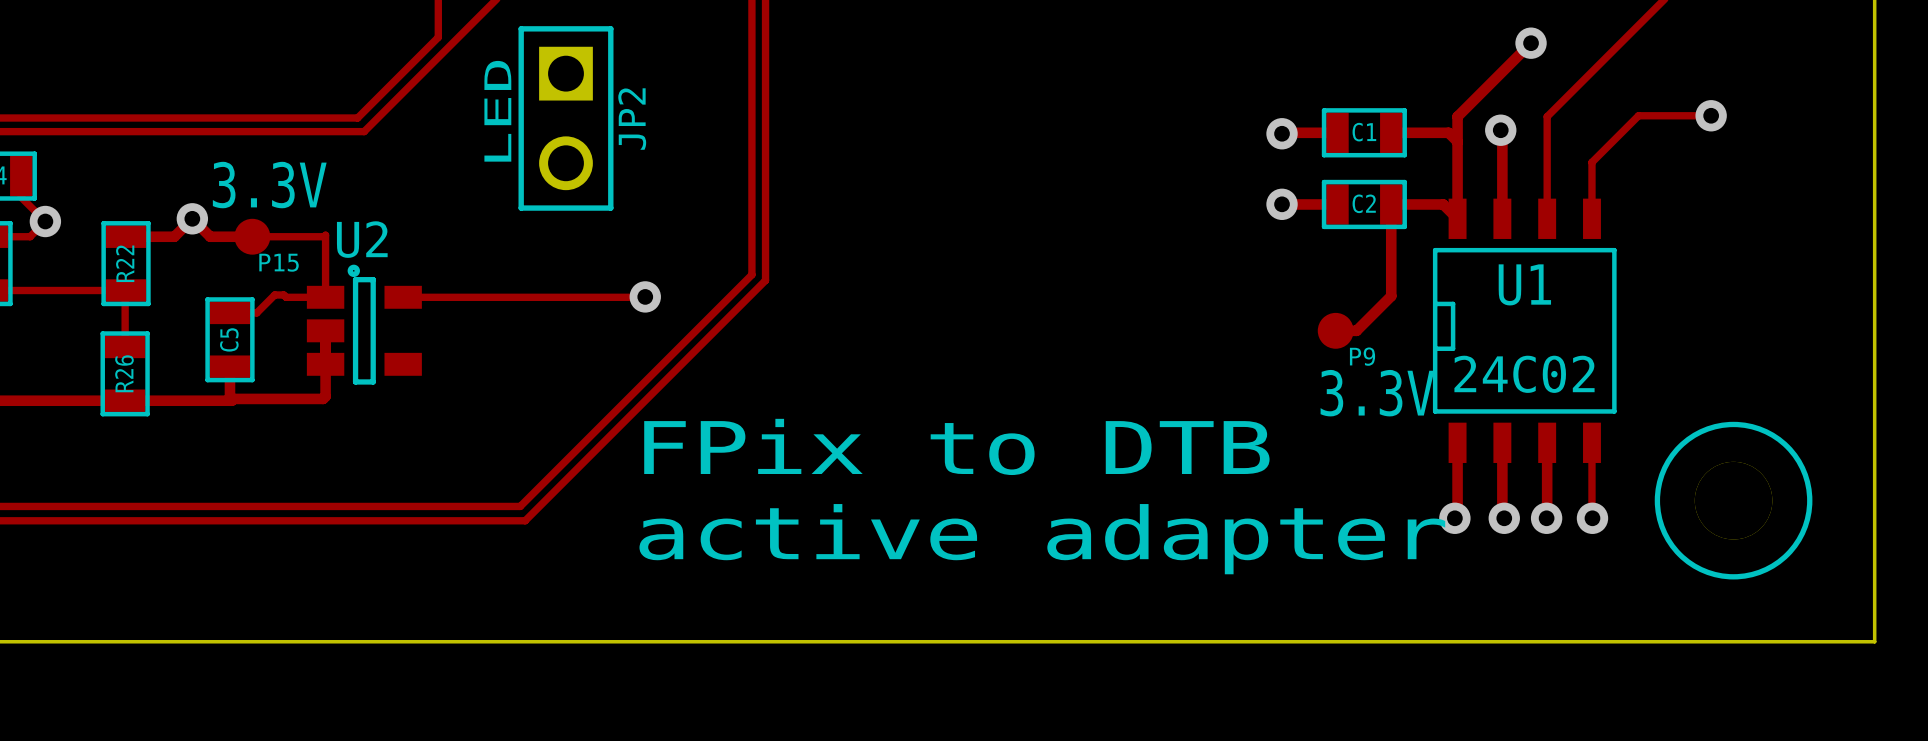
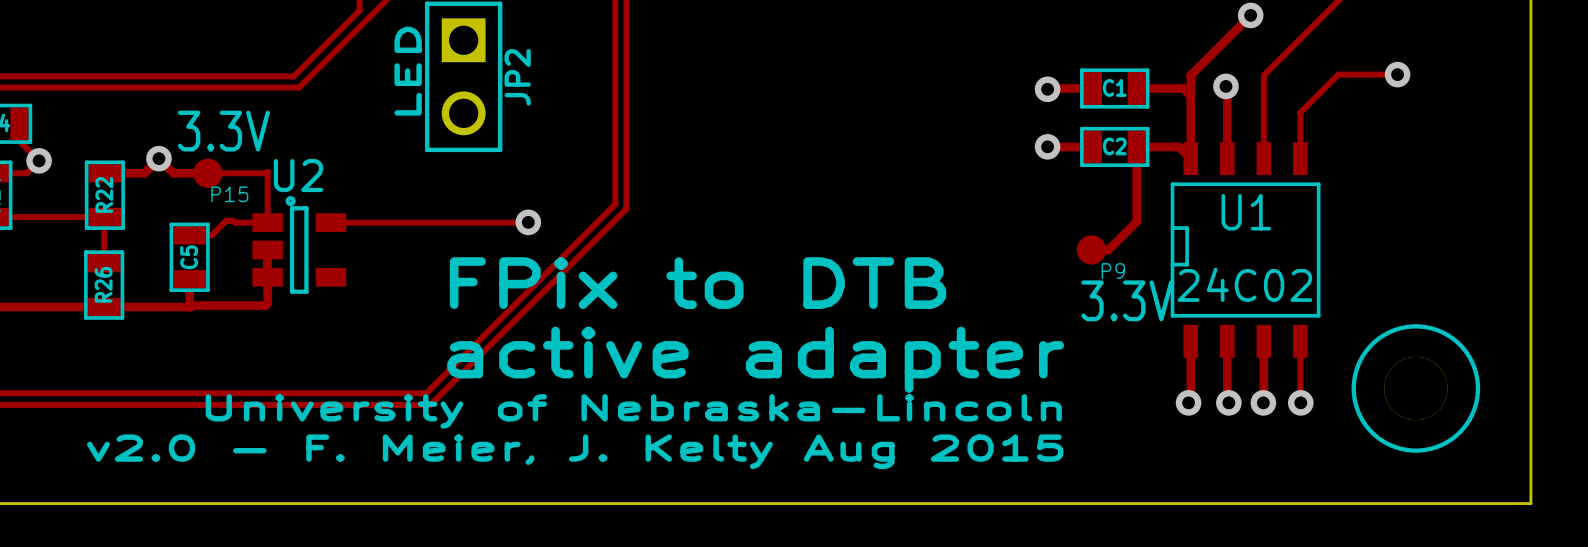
text position: FPix to DTB (956, 446) -> FPix to DTB (698, 283)
text: none -> University of Nebraska-Lincoln (633, 411)
text position: active adapter (1042, 539) -> active adapter (755, 359)
text: none -> v2.0 - F. Meier, J. Kelty Aug 2015 (575, 451)

